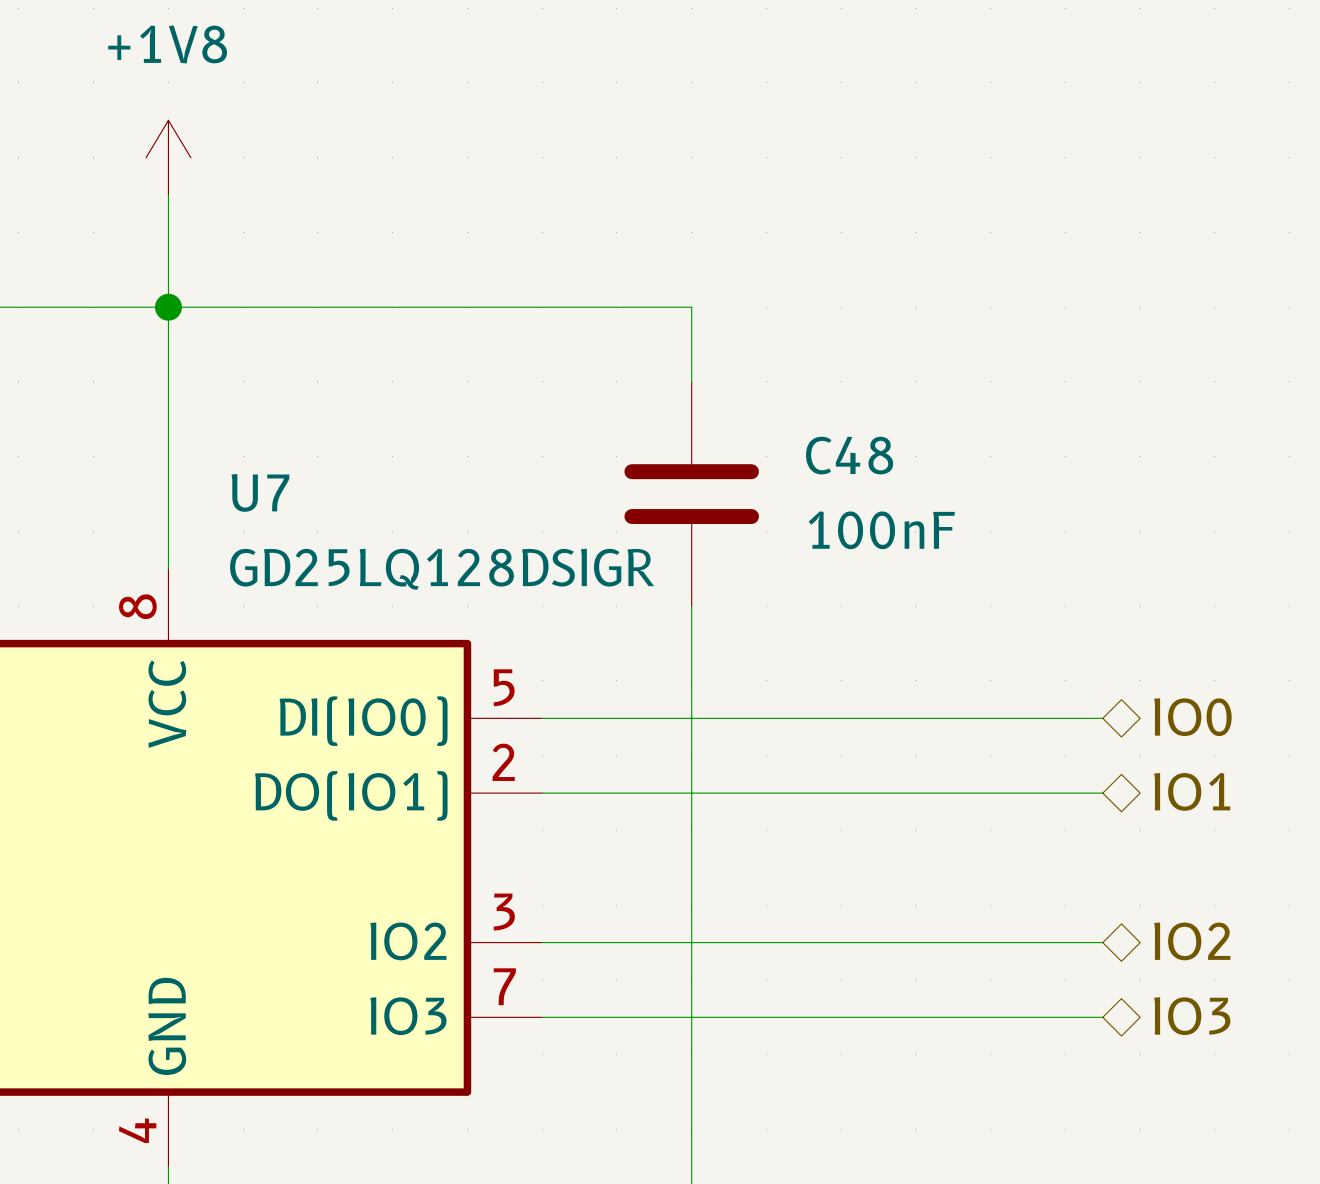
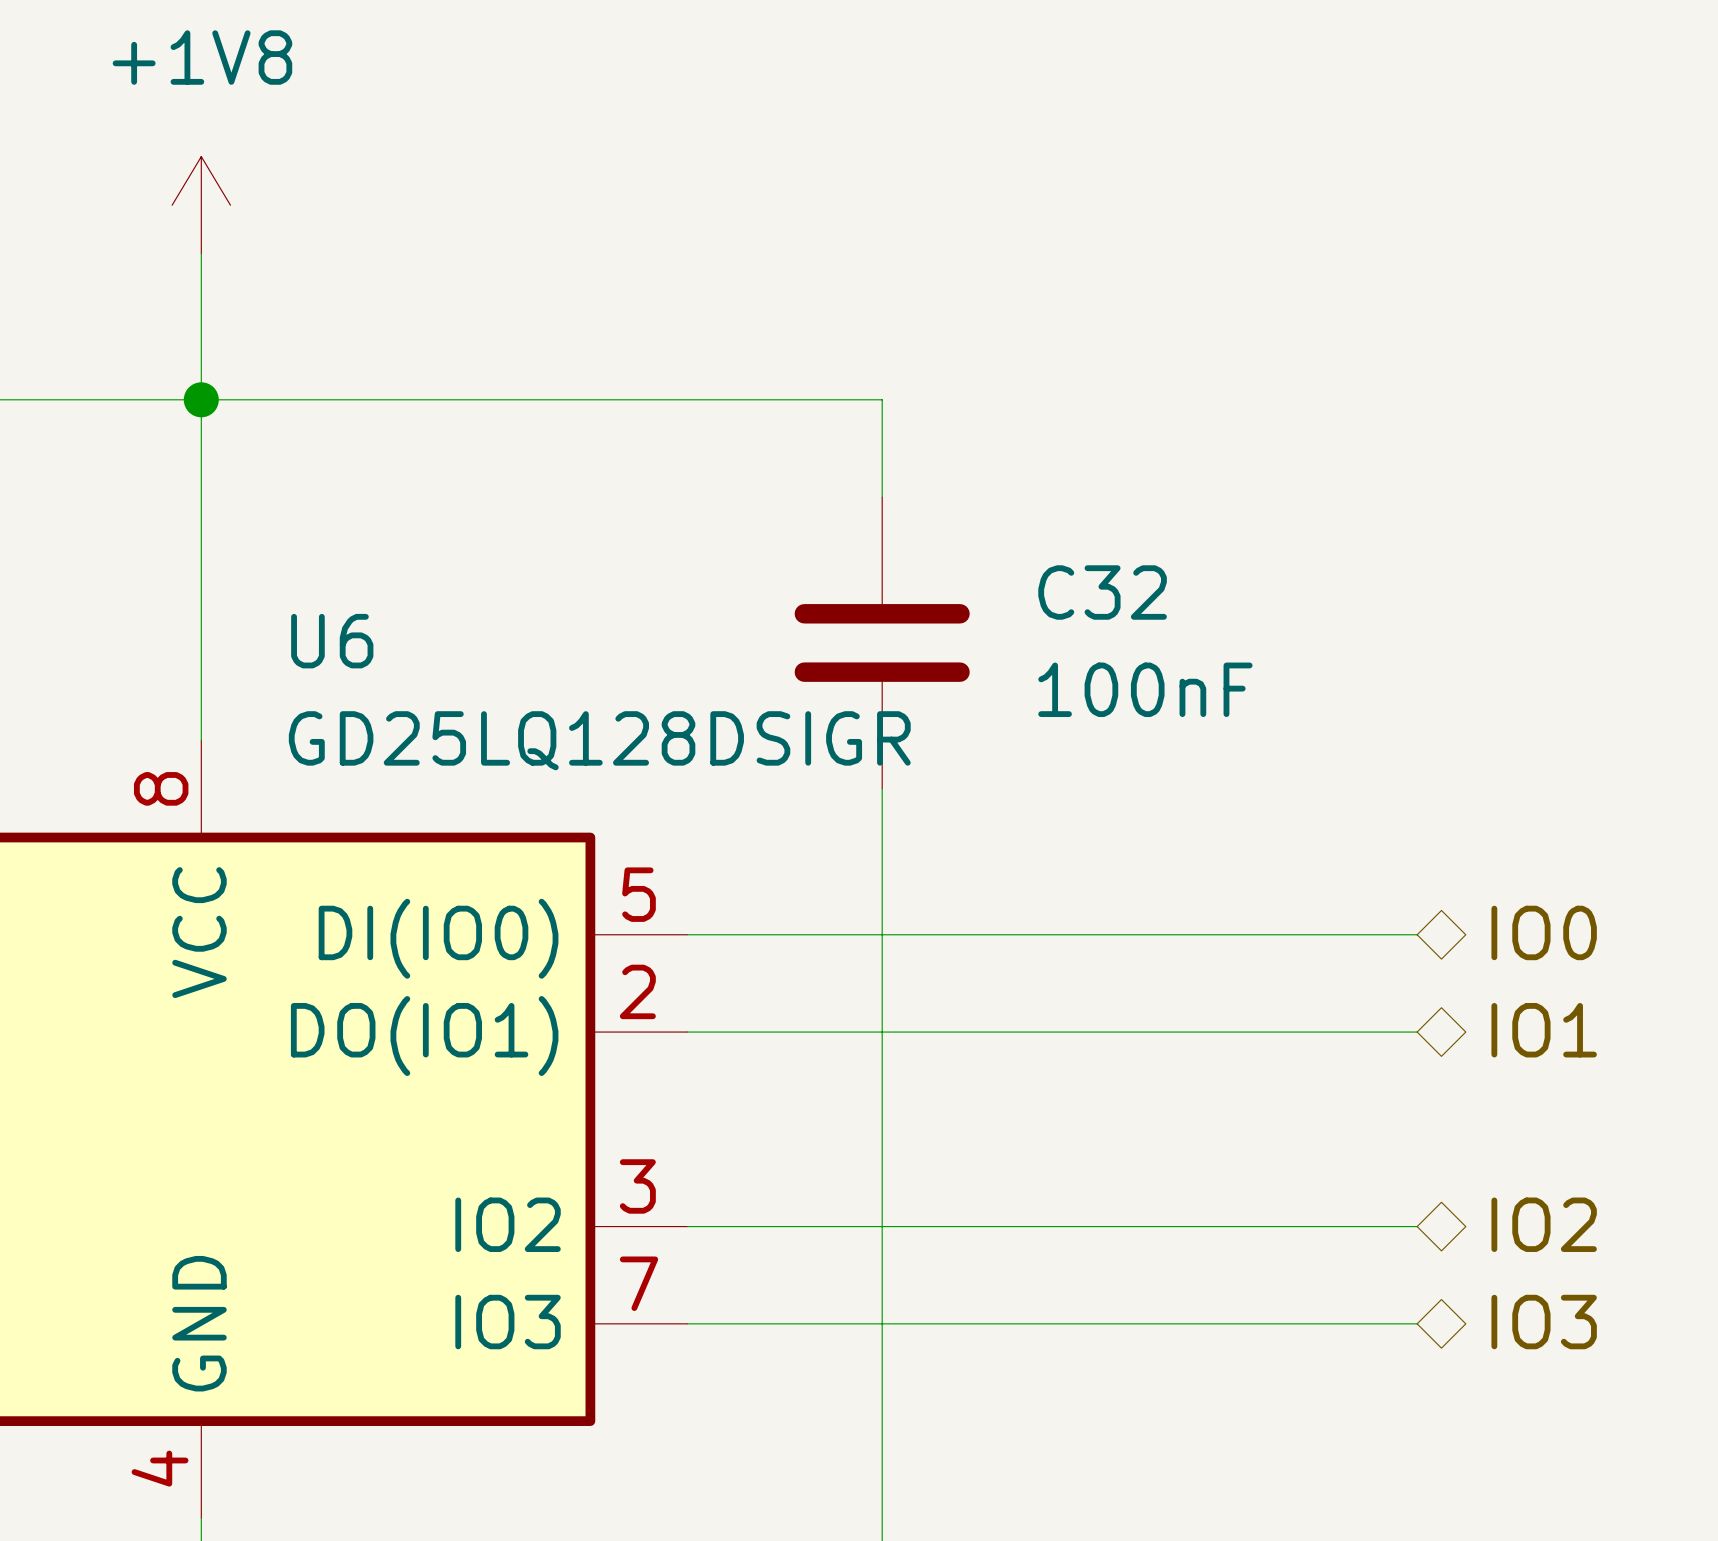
C48 name: C48 (849, 455) -> C32 (1102, 592)
U7 name: U7 (260, 492) -> U6 (332, 641)

